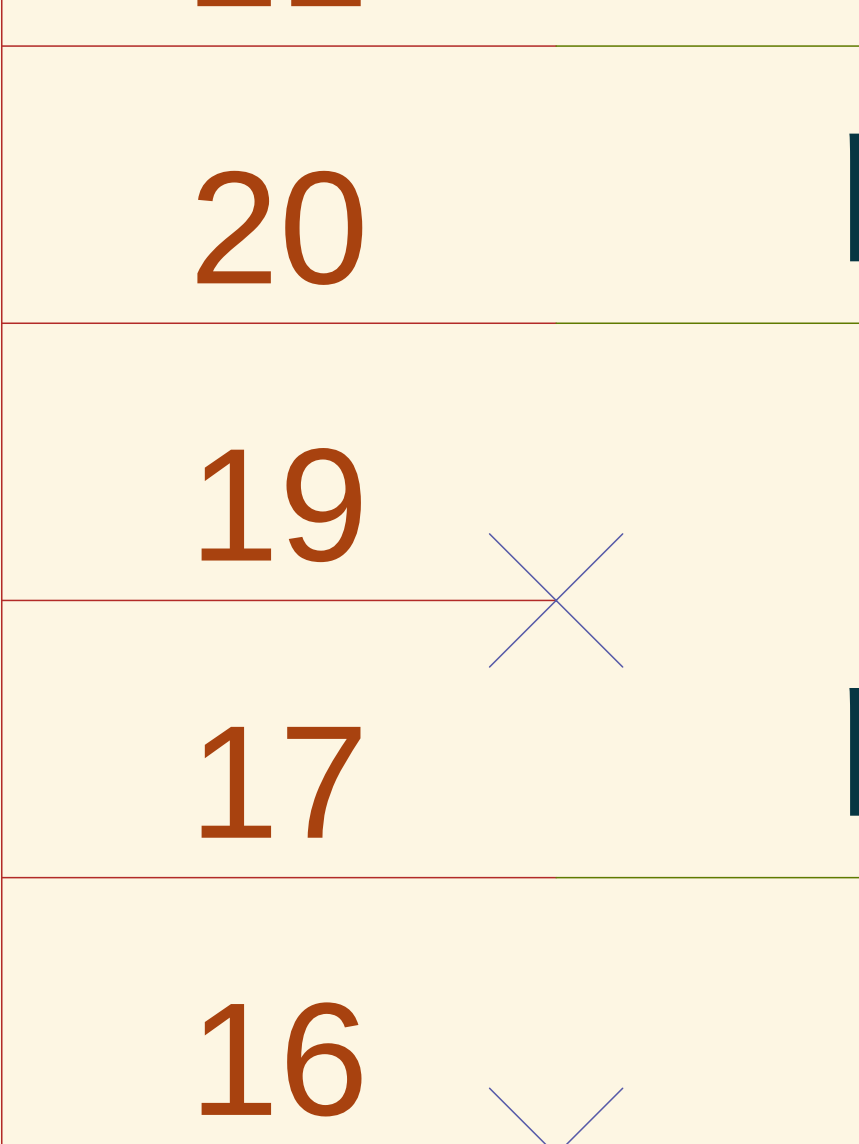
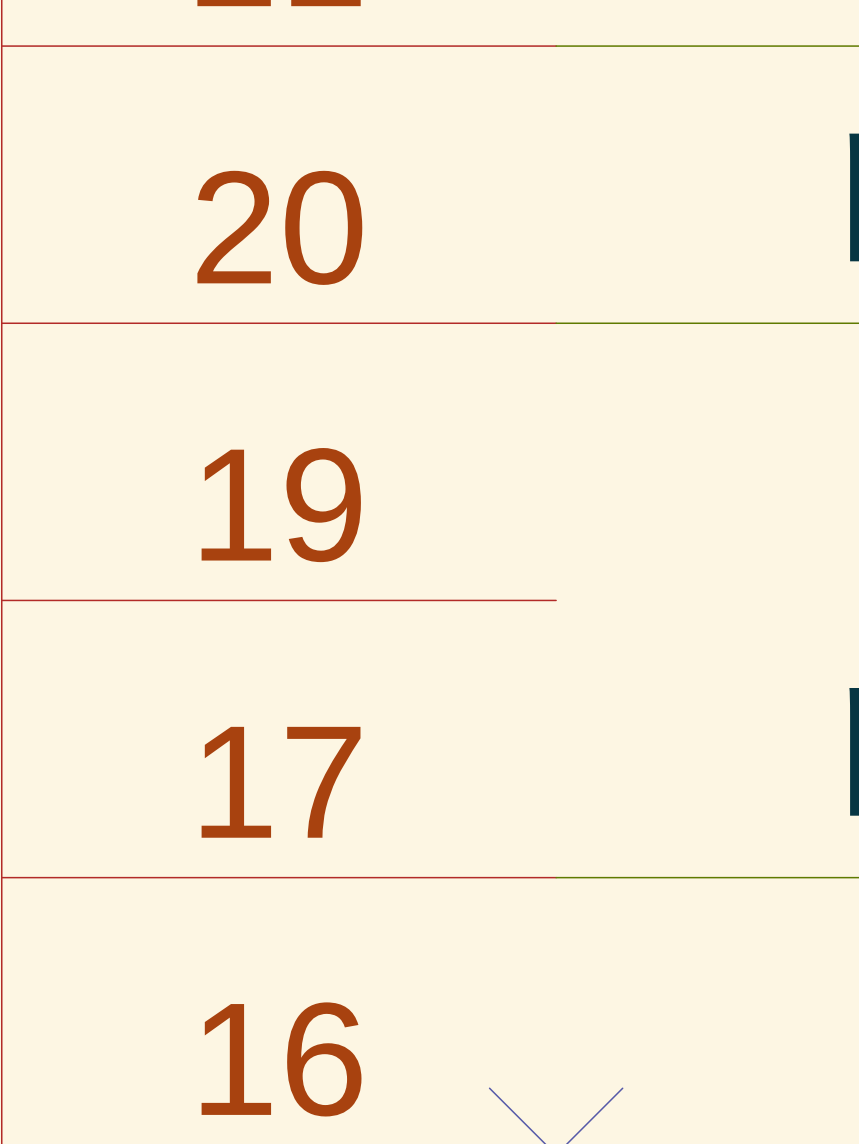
no-connect mark: (556, 600) -> none

